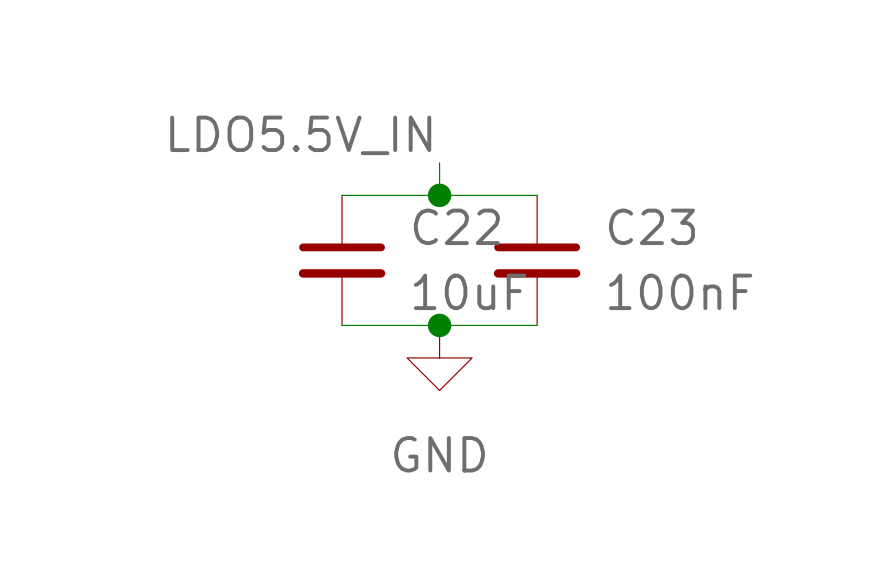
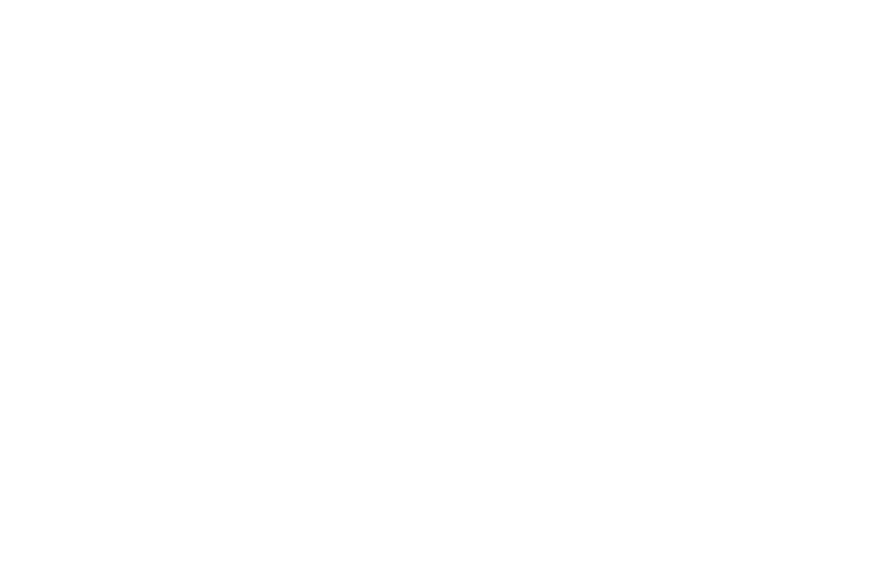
label: LDO5.5V_IN (300, 135) -> none
wire: (439, 162) (439, 195) -> none
wire: (342, 195) (537, 195) -> none
junction: (439, 195) -> none
C22: 10uF (342, 260) -> none
C23: 100nF (537, 260) -> none
wire: (342, 325) (537, 325) -> none
junction: (439, 325) -> none
power symbol: GND (439, 357) -> none

